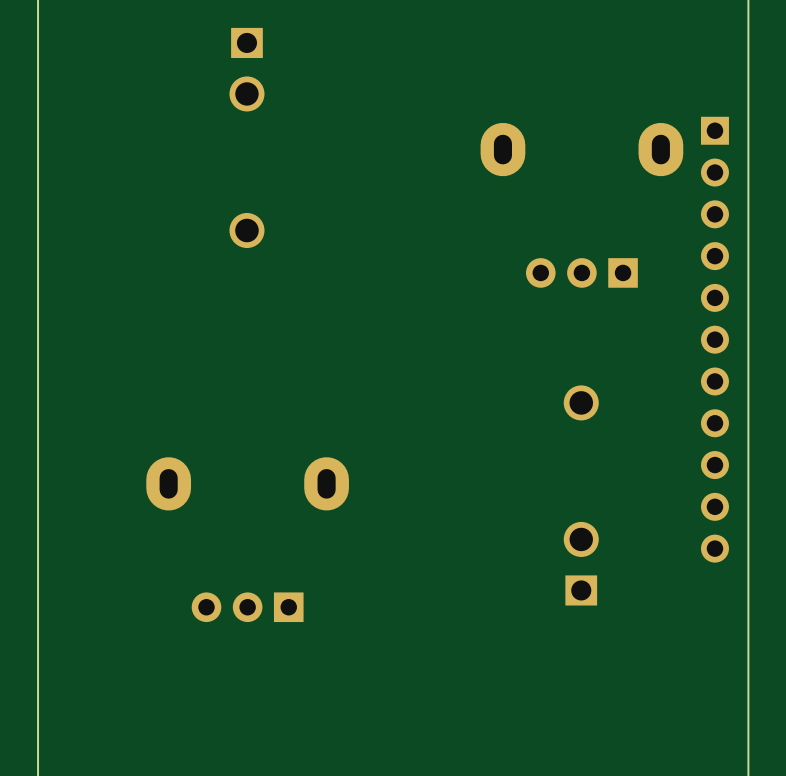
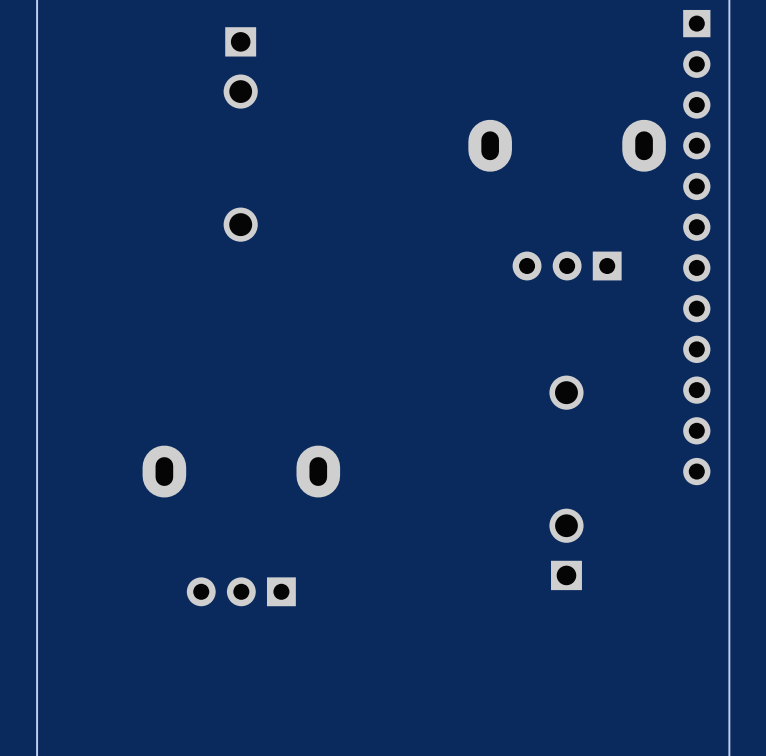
part: none -> (696, 247)
part: (714, 339) -> none

